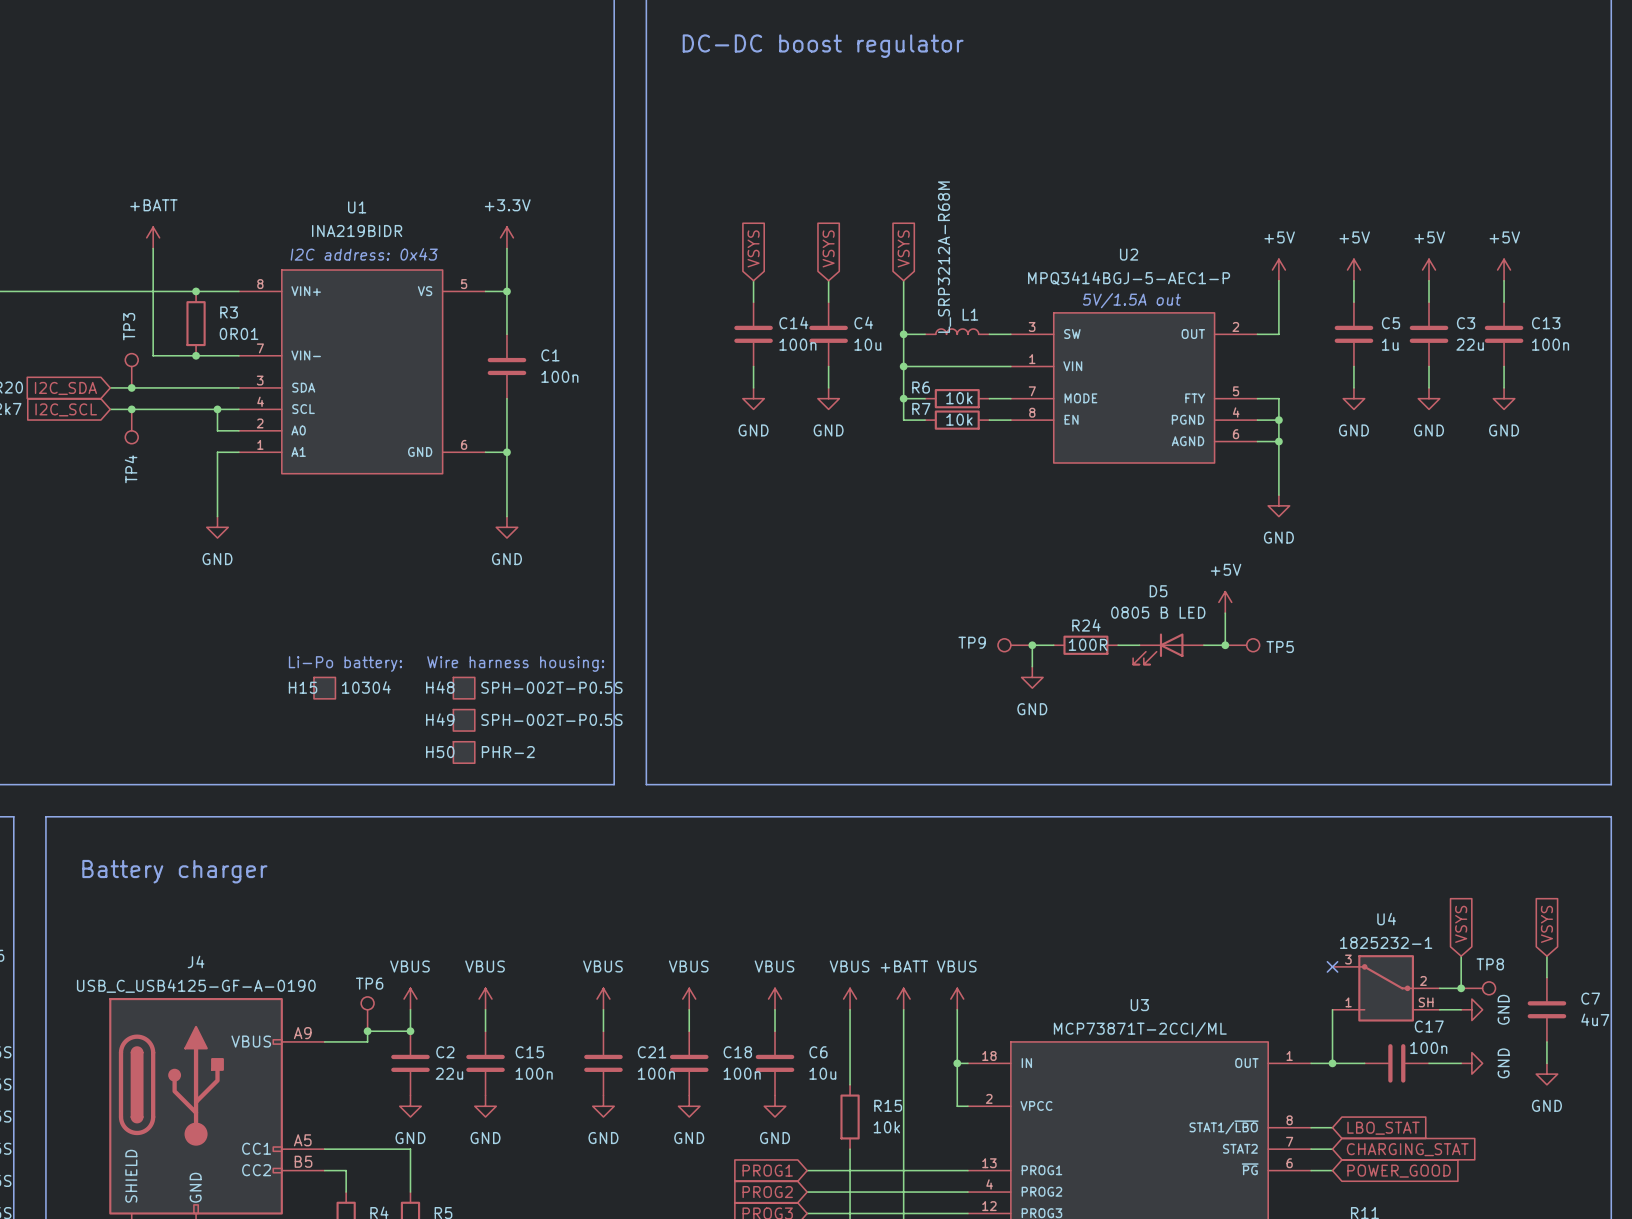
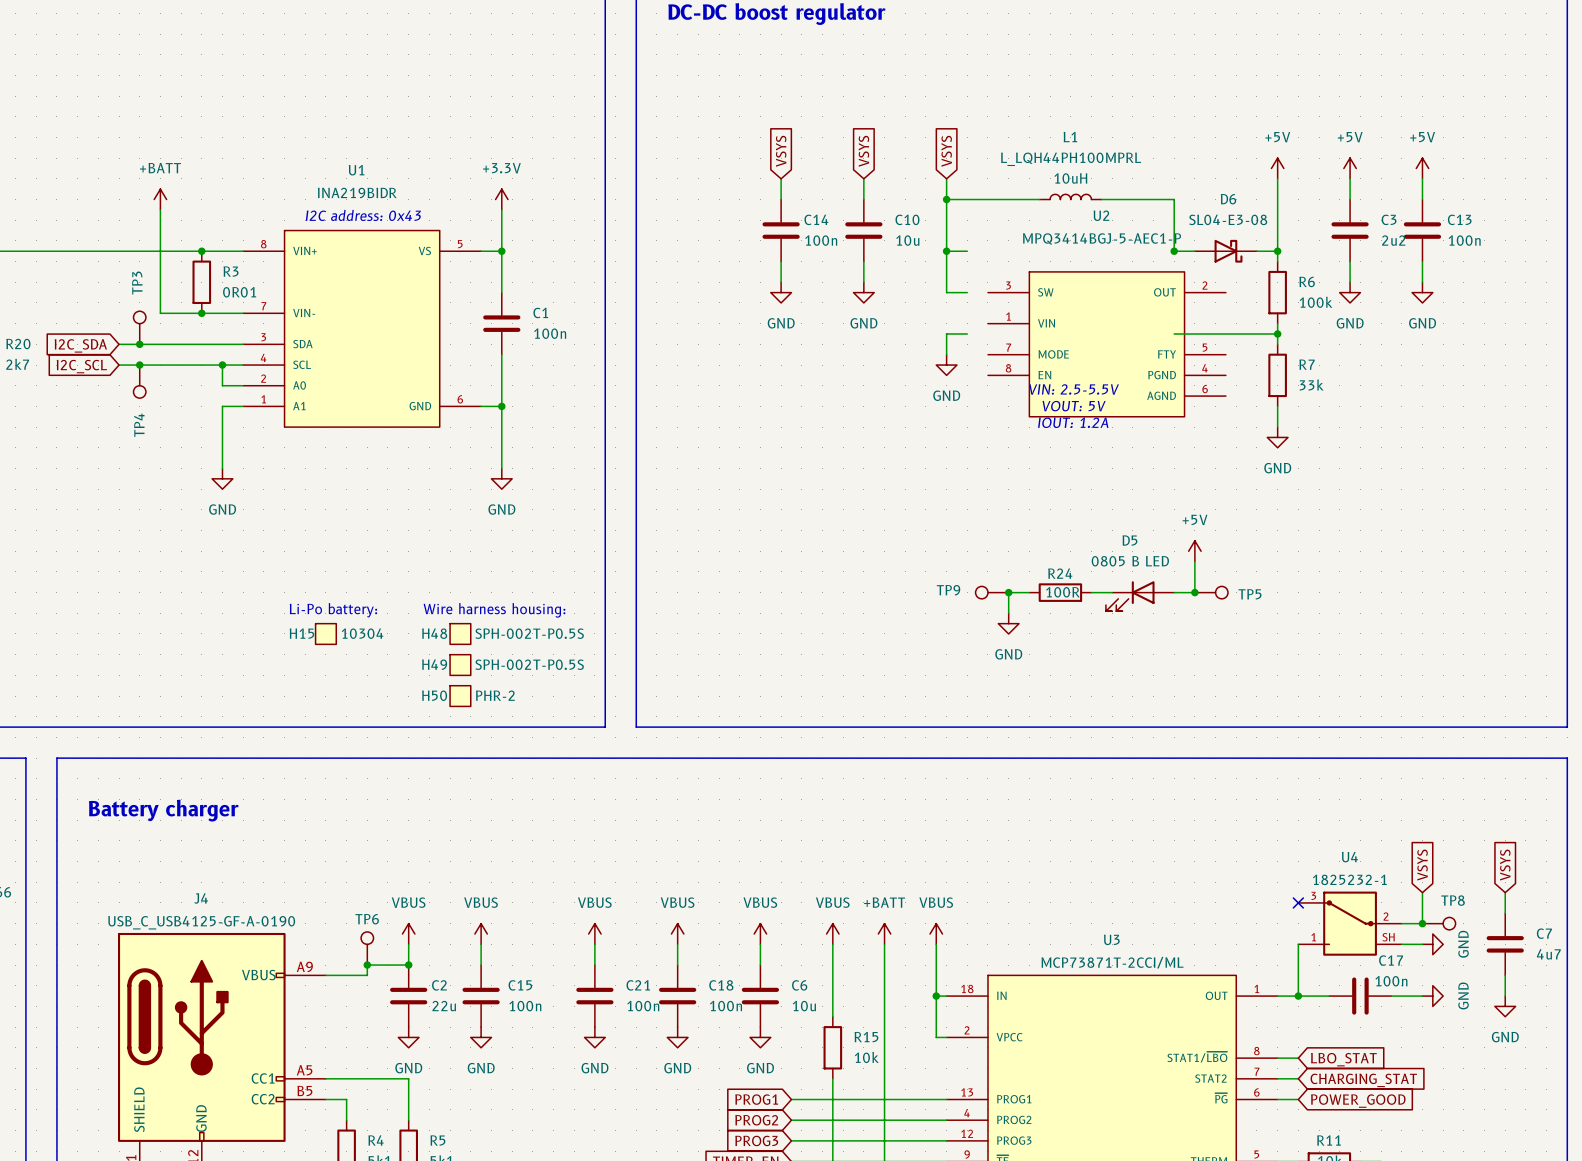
global label: none -> VSYS (781, 151)
global label: none -> VSYS (946, 151)
power symbol: none -> +5V (1277, 168)
power symbol: none -> +5V (1350, 168)
power symbol: none -> +5V (1422, 168)
L1 text: none -> 10uH (1070, 178)
wire: none -> (1277, 178) (1277, 261)
wire: none -> (946, 199) (1039, 199)
junction: none -> (946, 199)
wire: none -> (1101, 199) (1174, 199) (1174, 251) (1194, 251)
global label: VSYS (753, 248) -> none
global label: VSYS (828, 248) -> none
global label position: VSYS (903, 248) -> VSYS (863, 151)
L1 value: L_SRP3212A-R68M (944, 257) -> L_LQH44PH100MPRL (1071, 159)
C10: none -> 10u (863, 230)
power symbol: +5V (1278, 270) -> none
power symbol: +5V (1353, 270) -> none
power symbol: +5V (1429, 270) -> none
power symbol: +5V (1504, 270) -> none
wire: (753, 280) (753, 302) -> (863, 178) (863, 199)
wire: (828, 280) (828, 302) -> (781, 178) (781, 199)
wire: (903, 280) (903, 420) (925, 420) -> none
wire: (1278, 280) (1278, 334) (1257, 334) -> none
wire: (1353, 280) (1353, 302) -> (1350, 178) (1350, 199)
wire: (1429, 280) (1429, 302) -> (1422, 178) (1422, 199)
wire: (1504, 280) (1504, 302) -> none
junction: none -> (946, 251)
junction: none -> (1174, 251)
D6: none -> SL04-E3-08 (1225, 251)
junction: none -> (1277, 251)
text: 5V/1.5A out (1131, 300) -> none
L1 name position: L1 (970, 314) -> L1 (1070, 137)
C3 name position: C3 (1466, 323) -> C3 (1389, 219)
L1 position: (957, 331) -> (1070, 196)
C14 position: (753, 334) -> (781, 230)
power symbol: none -> GND (781, 292)
C4: 10u (828, 334) -> none
power symbol: none -> GND (863, 292)
wire: (903, 334) (925, 334) -> (946, 251) (967, 251)
junction: (903, 334) -> none
wire: (989, 334) (1010, 334) -> (967, 292) (946, 292) (946, 178)
C5: 1u (1353, 334) -> none
power symbol: none -> GND (1350, 292)
C3 position: (1429, 334) -> (1350, 230)
power symbol: none -> GND (1422, 292)
C13 position: (1504, 334) -> (1422, 230)
C3 value: 22u (1470, 344) -> 2u2 (1393, 240)
wire: (753, 366) (753, 387) -> (863, 261) (863, 282)
wire: (828, 366) (828, 387) -> (781, 261) (781, 282)
wire: (903, 366) (1010, 366) -> none
junction: (903, 366) -> none
wire: (1353, 366) (1353, 387) -> (1350, 261) (1350, 282)
wire: (1429, 366) (1429, 387) -> (1422, 261) (1422, 282)
wire: (1504, 366) (1504, 387) -> (1277, 323) (1277, 344)
wire: none -> (967, 334) (946, 334) (946, 354)
wire: none -> (1174, 334) (1277, 334)
junction: none -> (1277, 334)
R6 name position: R6 (921, 387) -> R6 (1307, 281)
power symbol: GND (753, 398) -> none
power symbol: GND (828, 398) -> none
wire: (903, 398) (925, 398) -> none
junction: (903, 398) -> none
R6 rotation: 0° (957, 398) -> 90° clockwise (1277, 292)
R6 position: (957, 398) -> (1277, 292)
R6 value: 10k (959, 398) -> 100k (1316, 302)
wire: (989, 398) (1010, 398) -> none
wire: (1257, 398) (1278, 398) (1278, 495) -> none
power symbol: GND (1353, 398) -> none
power symbol: GND (1429, 398) -> none
power symbol: GND (1504, 398) -> none
R7 name position: R7 (921, 408) -> R7 (1307, 364)
power symbol: none -> GND (946, 365)
R7 value: 10k (959, 419) -> 33k (1311, 384)
R7 rotation: 0° (957, 420) -> 90° clockwise (1277, 375)
R7 position: (957, 420) -> (1277, 375)
wire: (989, 420) (1010, 420) -> none
wire: (1257, 420) (1278, 420) -> none
junction: (1278, 420) -> none
text: none -> VIN: 2.5-5.5V (1074, 389)
wire: (1257, 441) (1278, 441) -> (1256, 251) (1277, 251)
junction: (1278, 441) -> none
text: none -> VOUT: 5V (1074, 406)
wire: none -> (1277, 406) (1277, 427)
text: none -> IOUT: 1.2A (1073, 422)
power symbol position: GND (1278, 505) -> GND (1277, 437)

